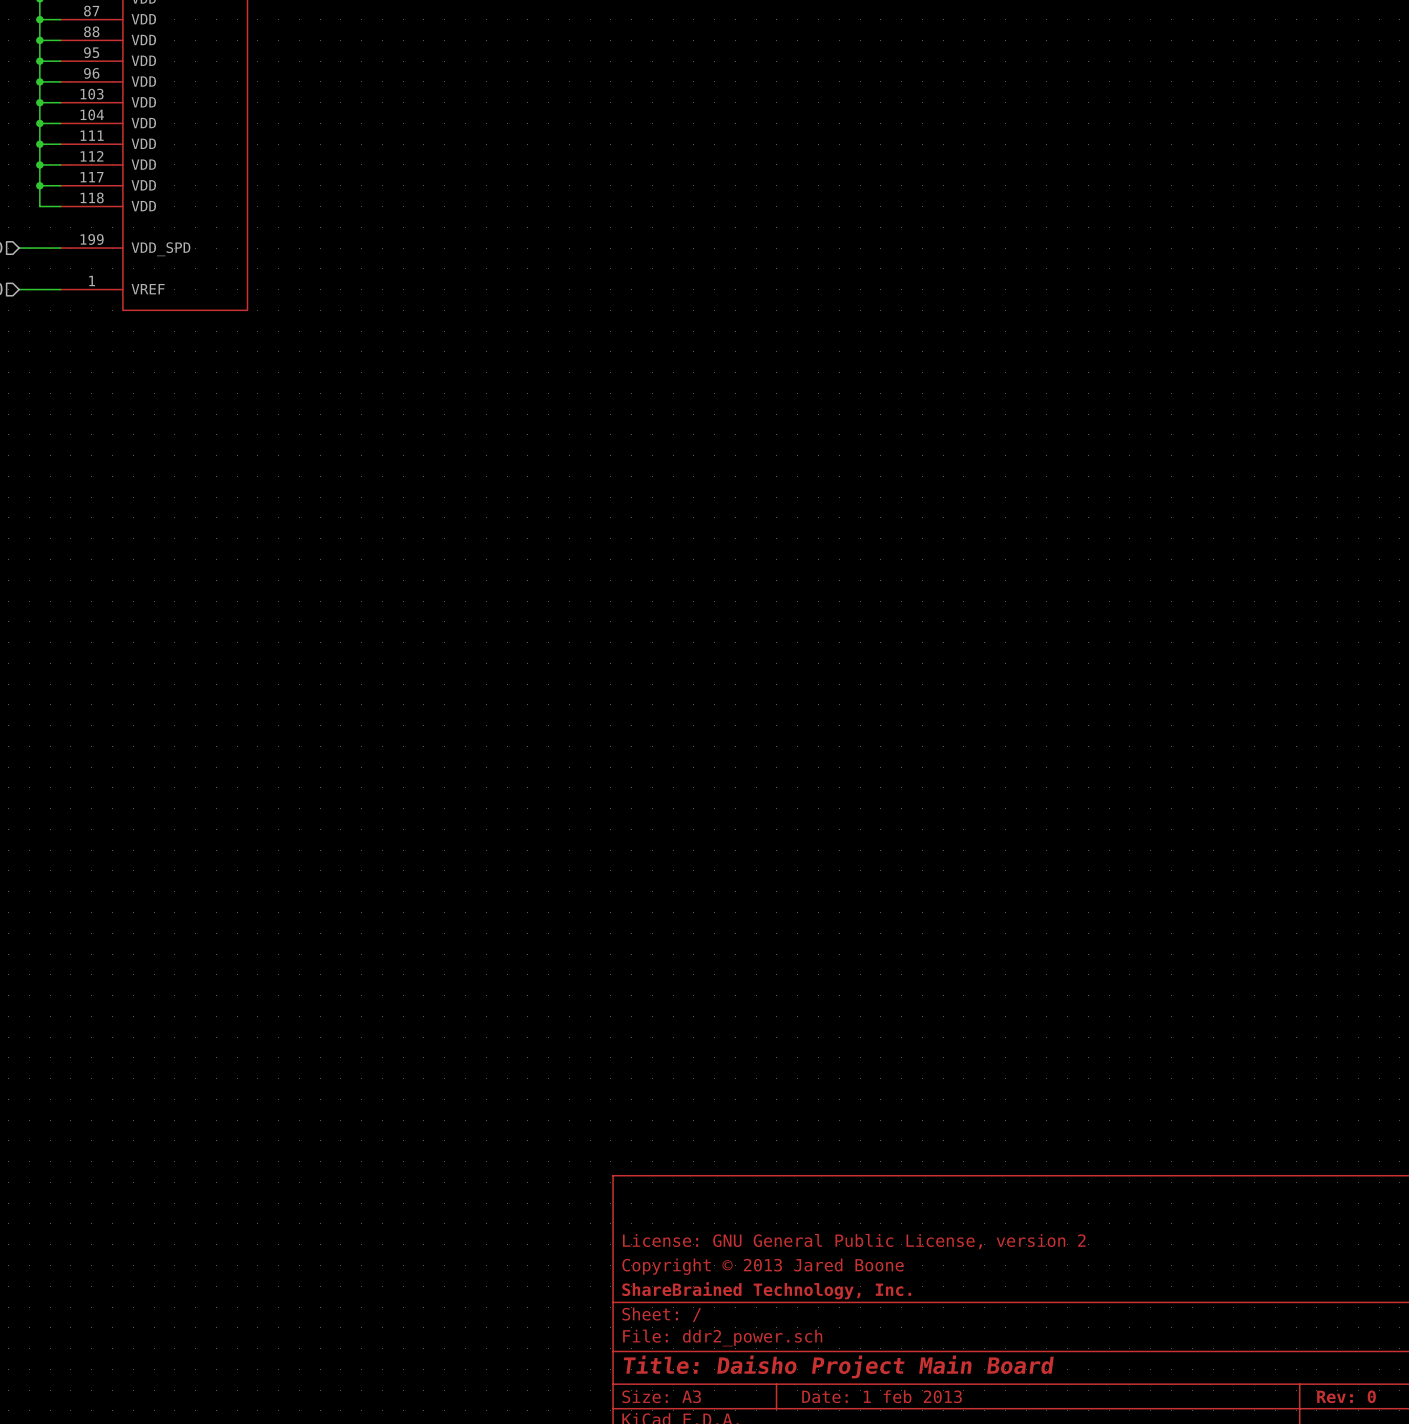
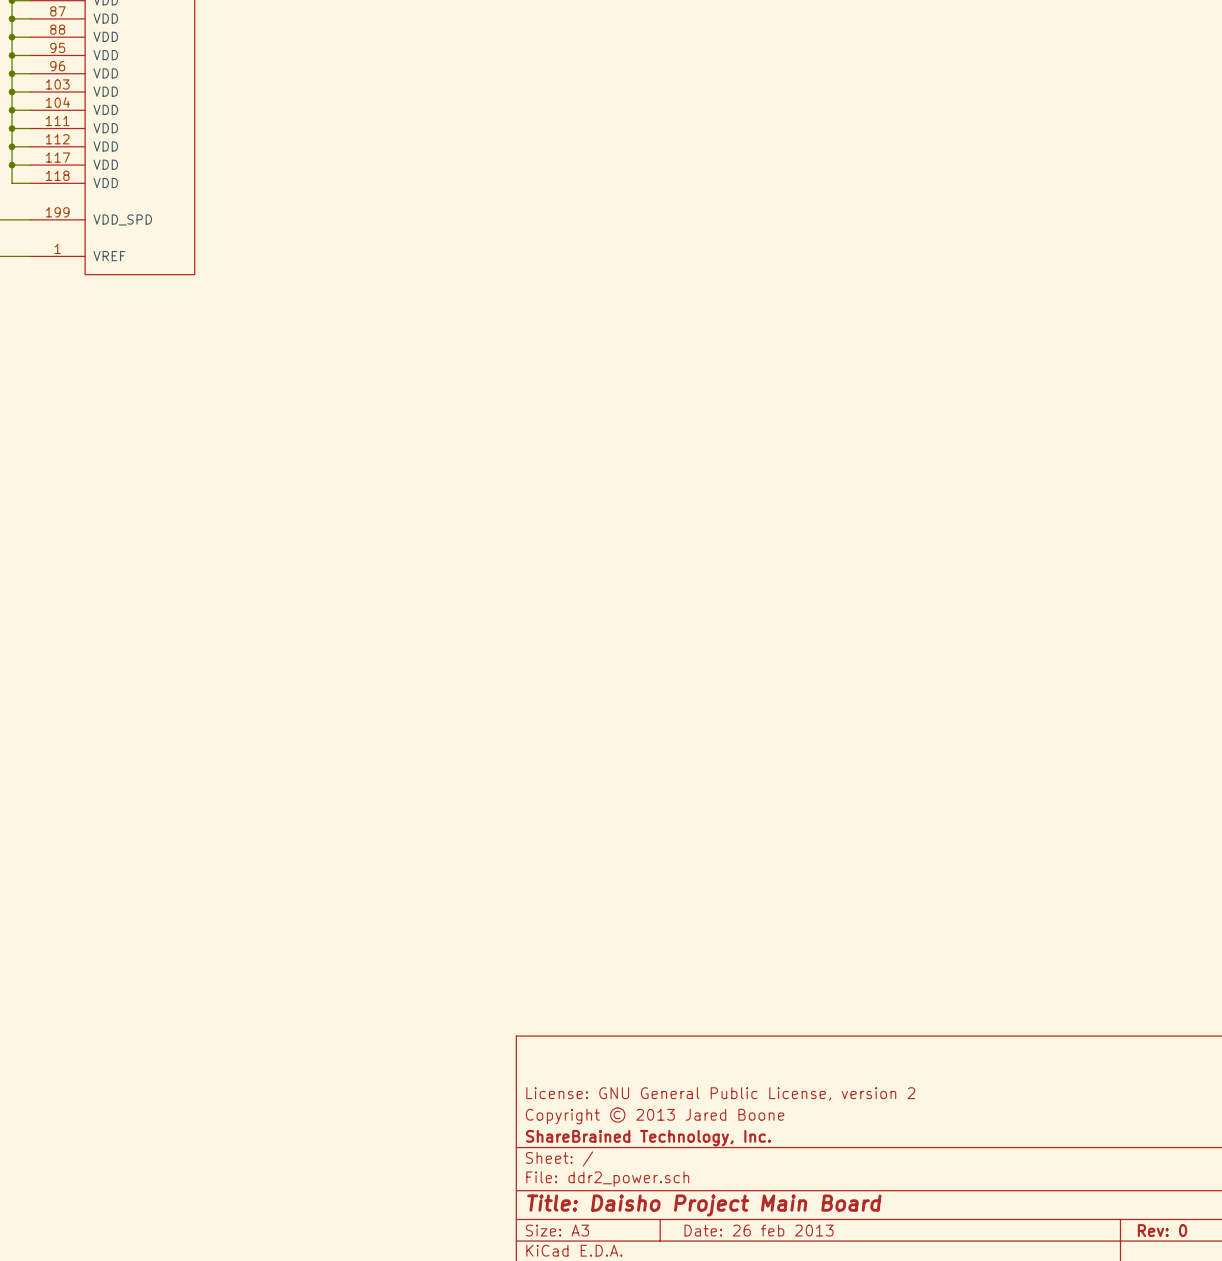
title block: Date: 1 feb 2013 (882, 1396) -> Date: 26 feb 2013 (759, 1230)

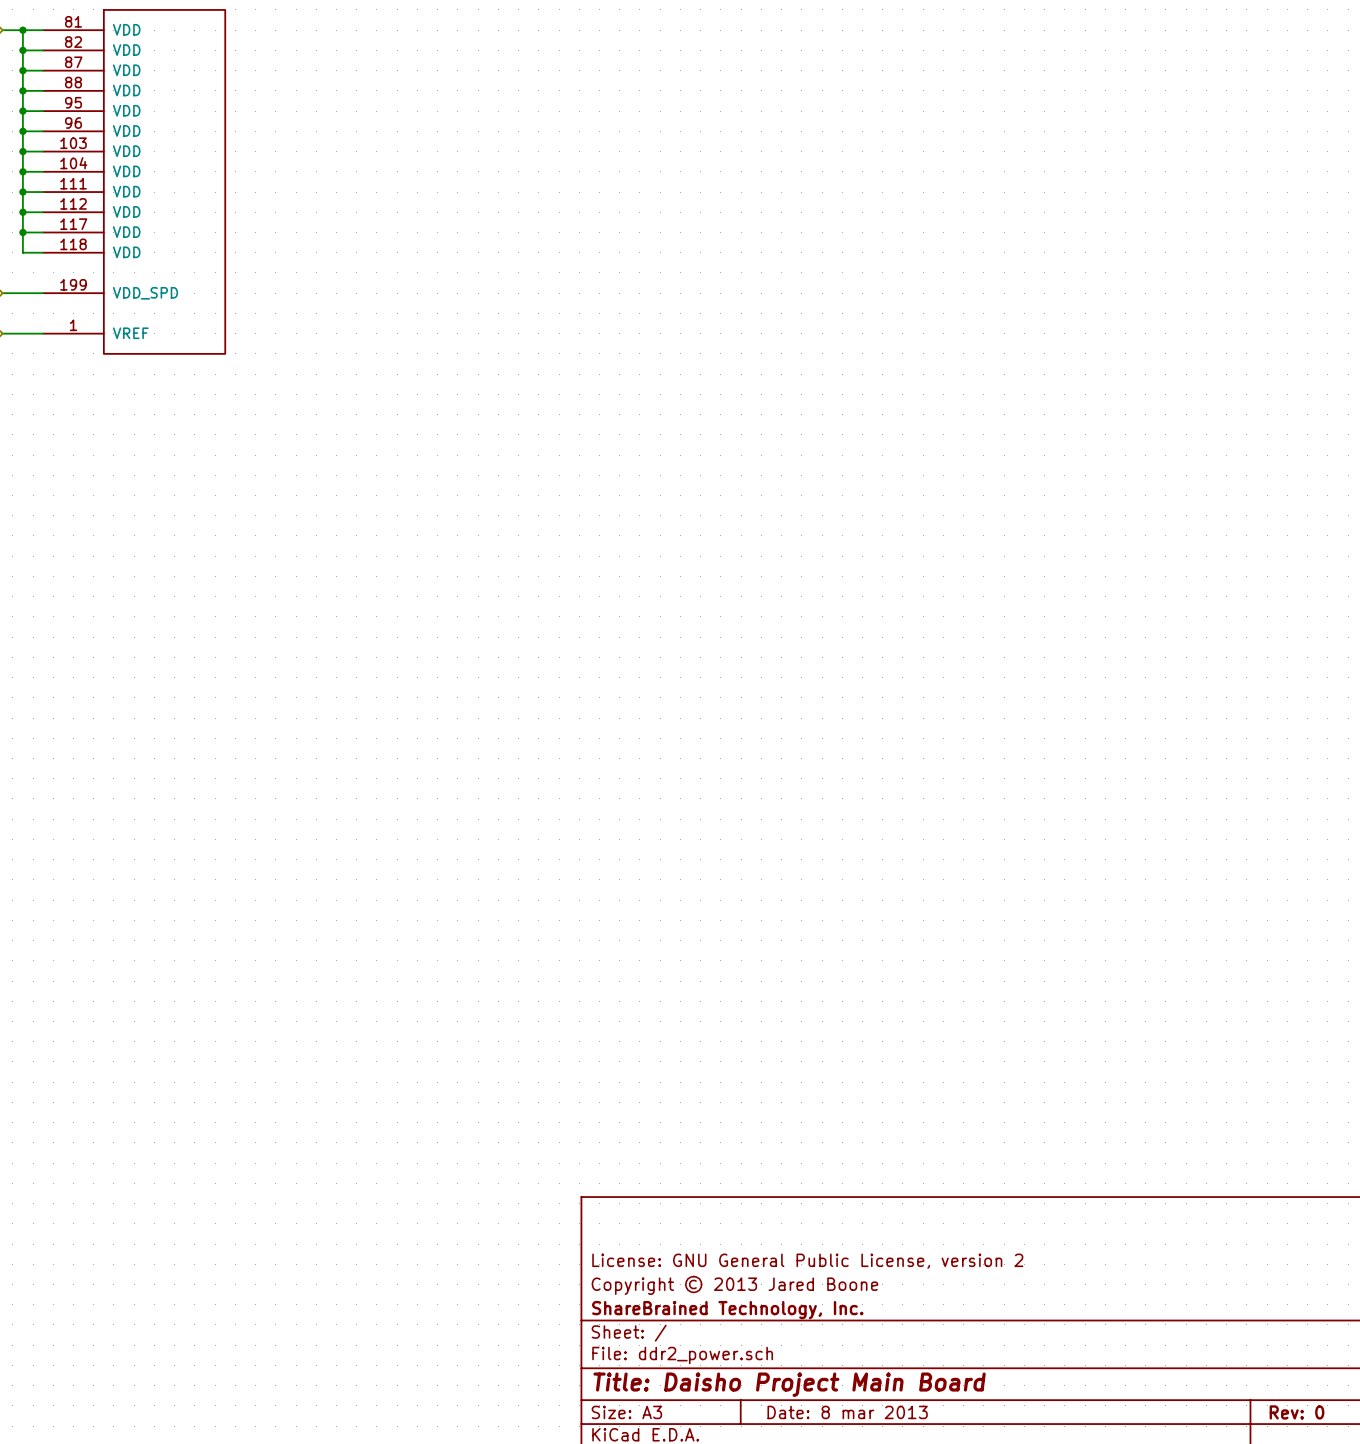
title block: Date: 26 feb 2013 (759, 1230) -> Date: 8 mar 2013 (847, 1412)

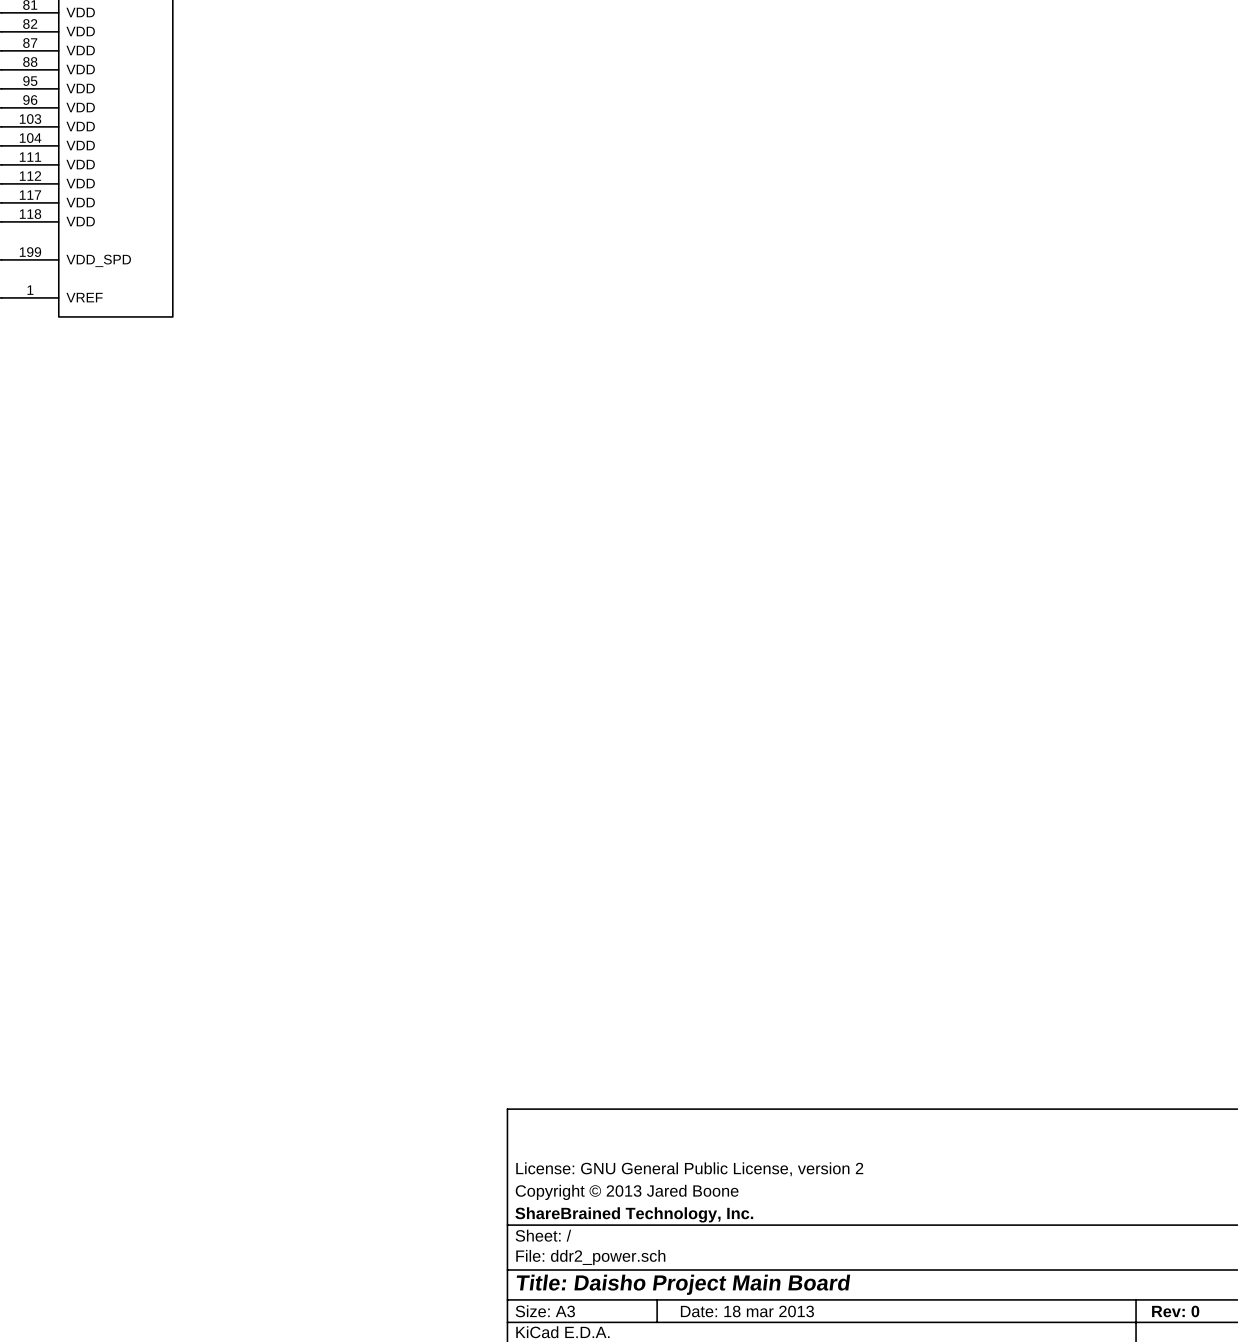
title block: Date: 8 mar 2013 (847, 1412) -> Date: 18 mar 2013 (747, 1311)

